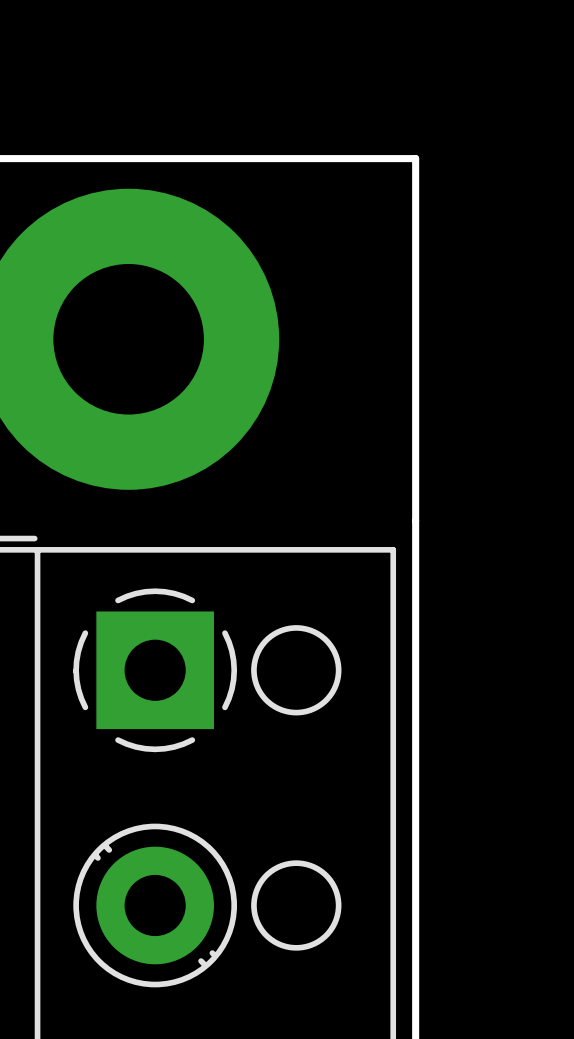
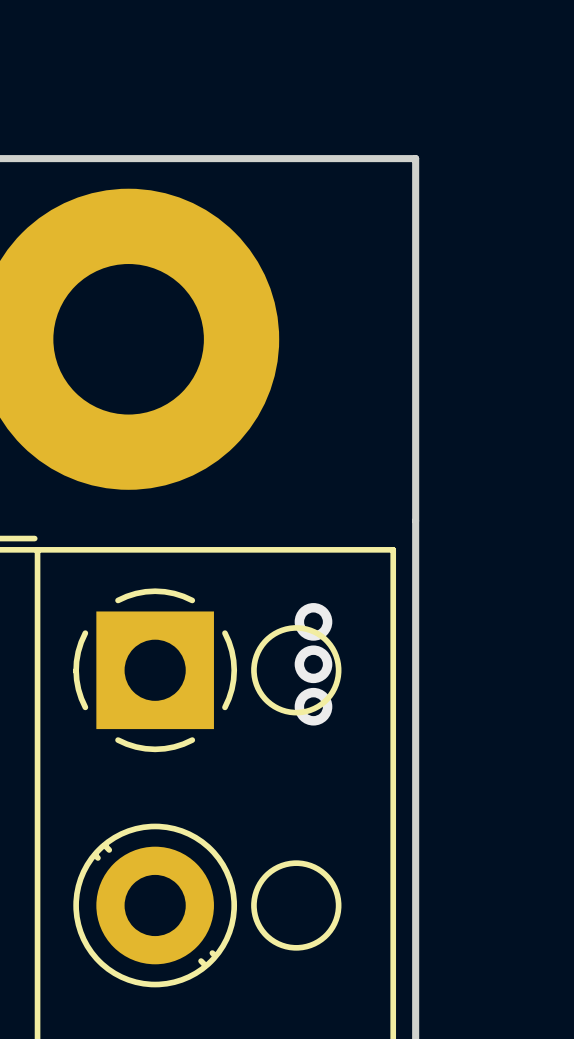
via: none -> (313, 621)
via: none -> (313, 664)
via: none -> (313, 706)

